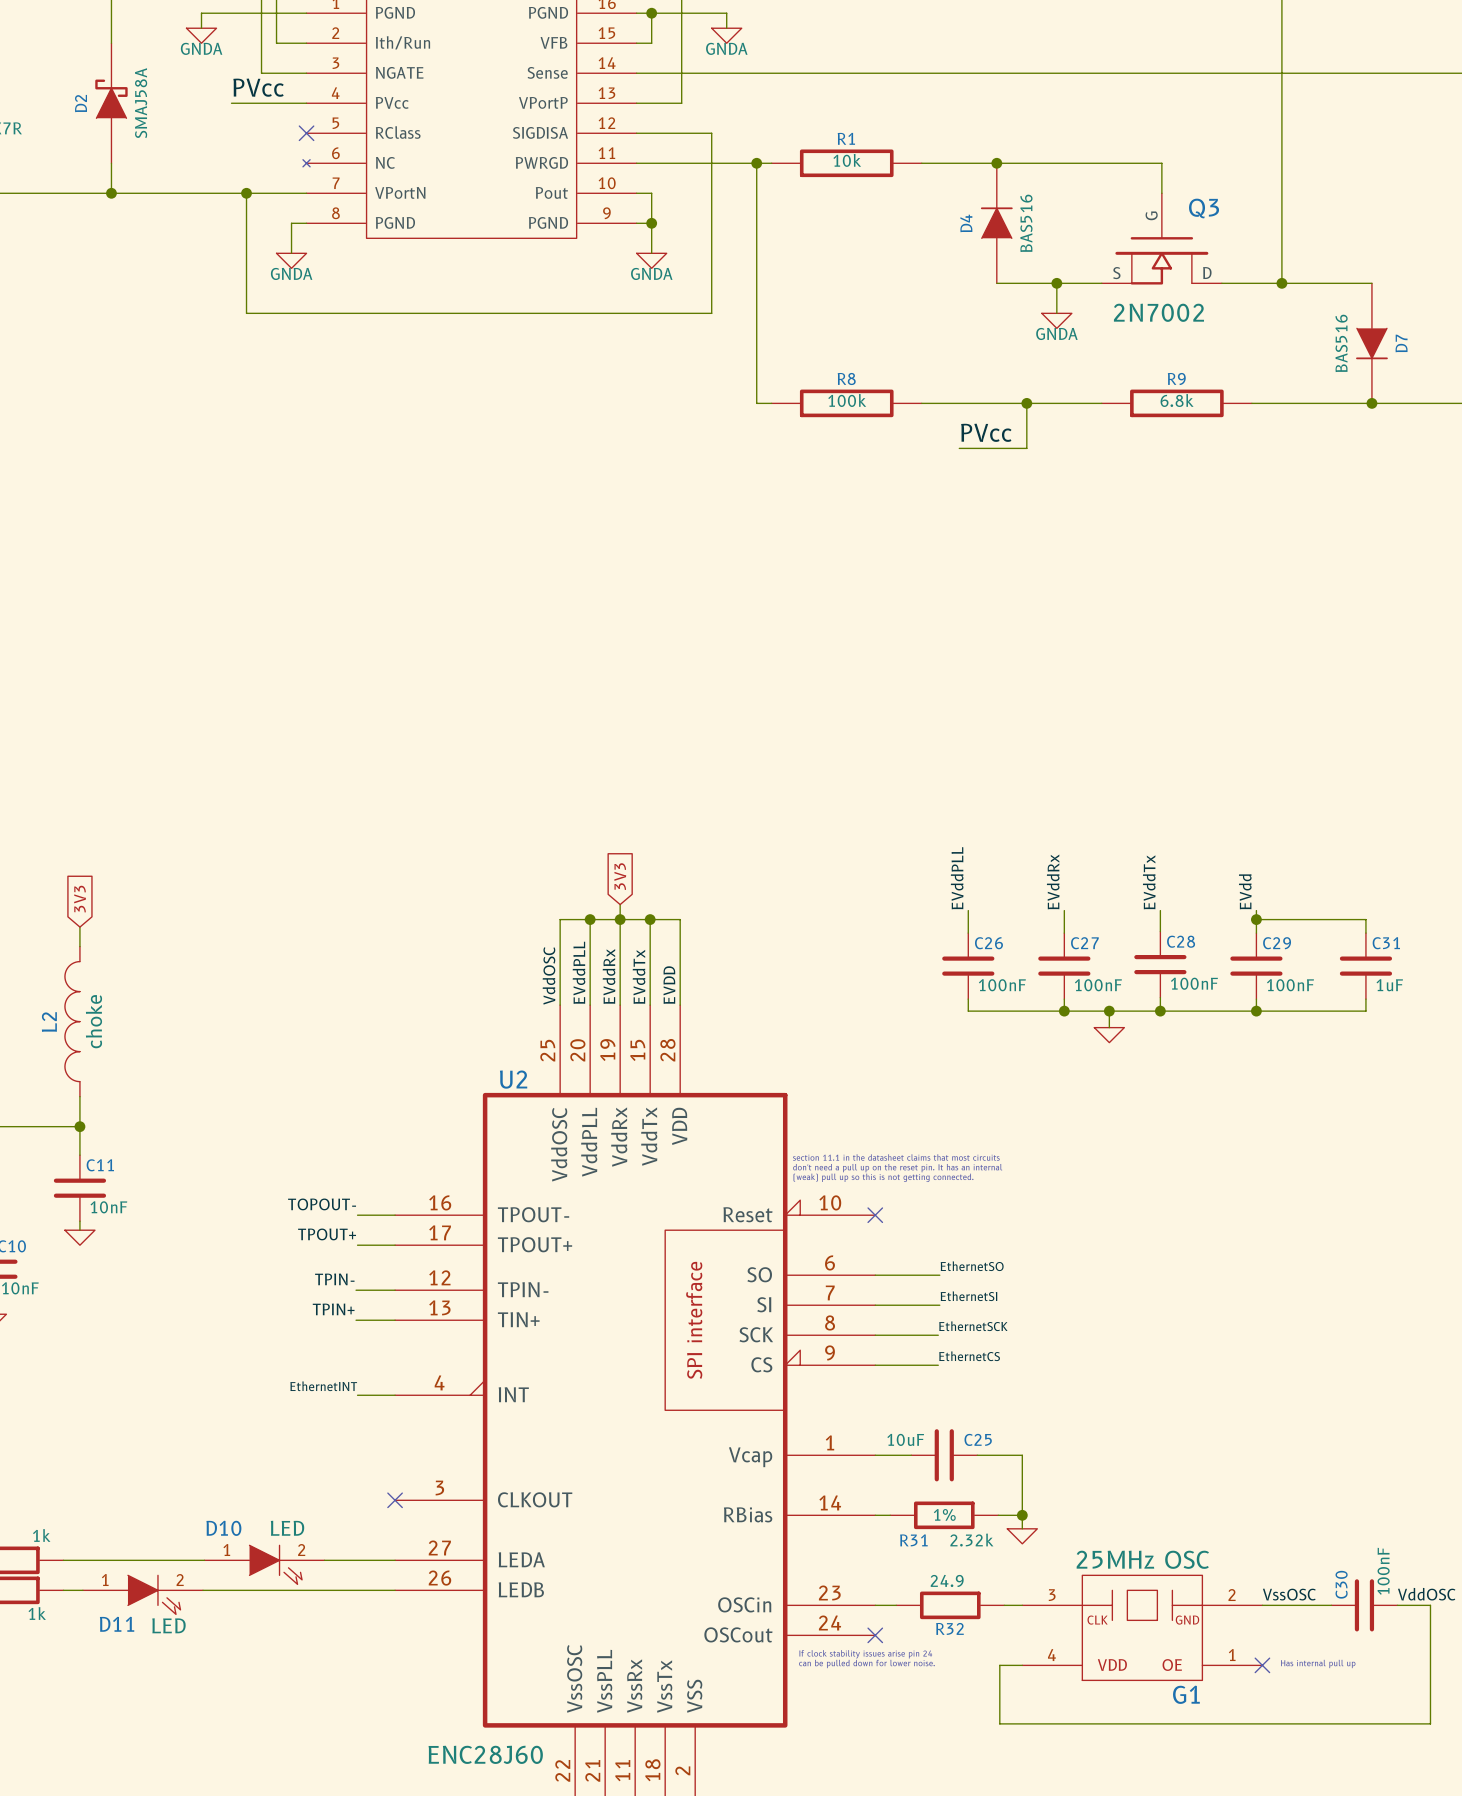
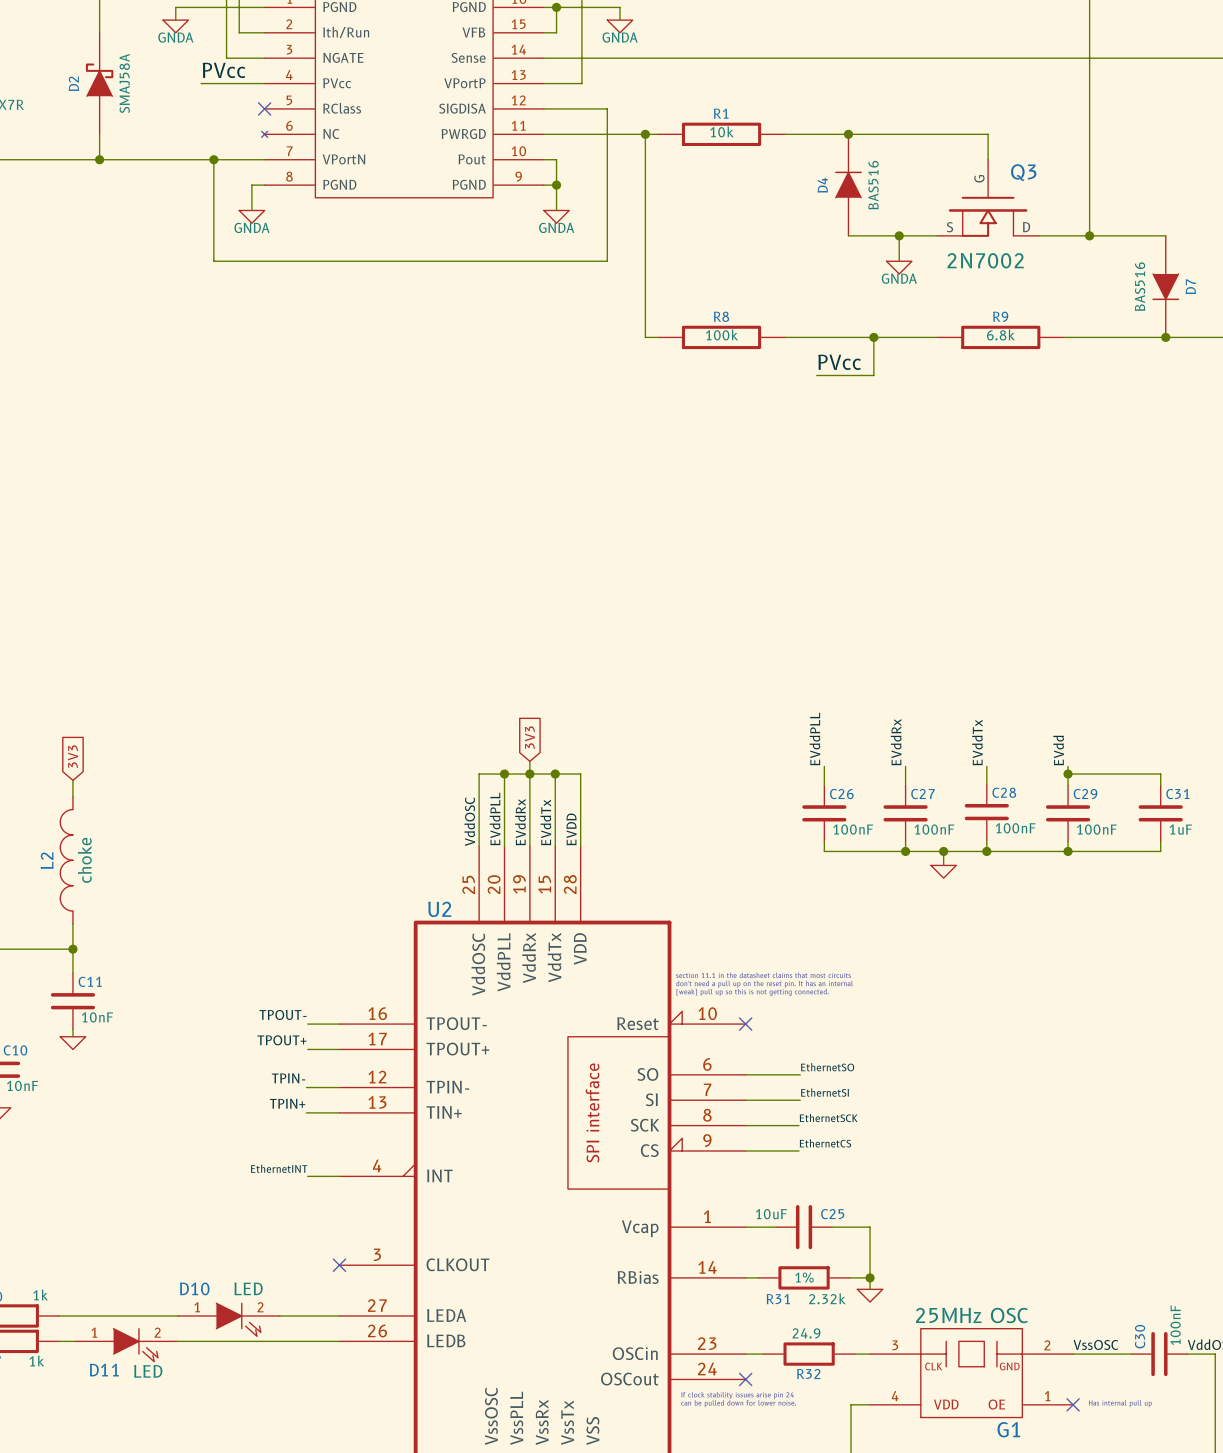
label: TOPOUT- (322, 1204) -> TPOUT- (282, 1014)

